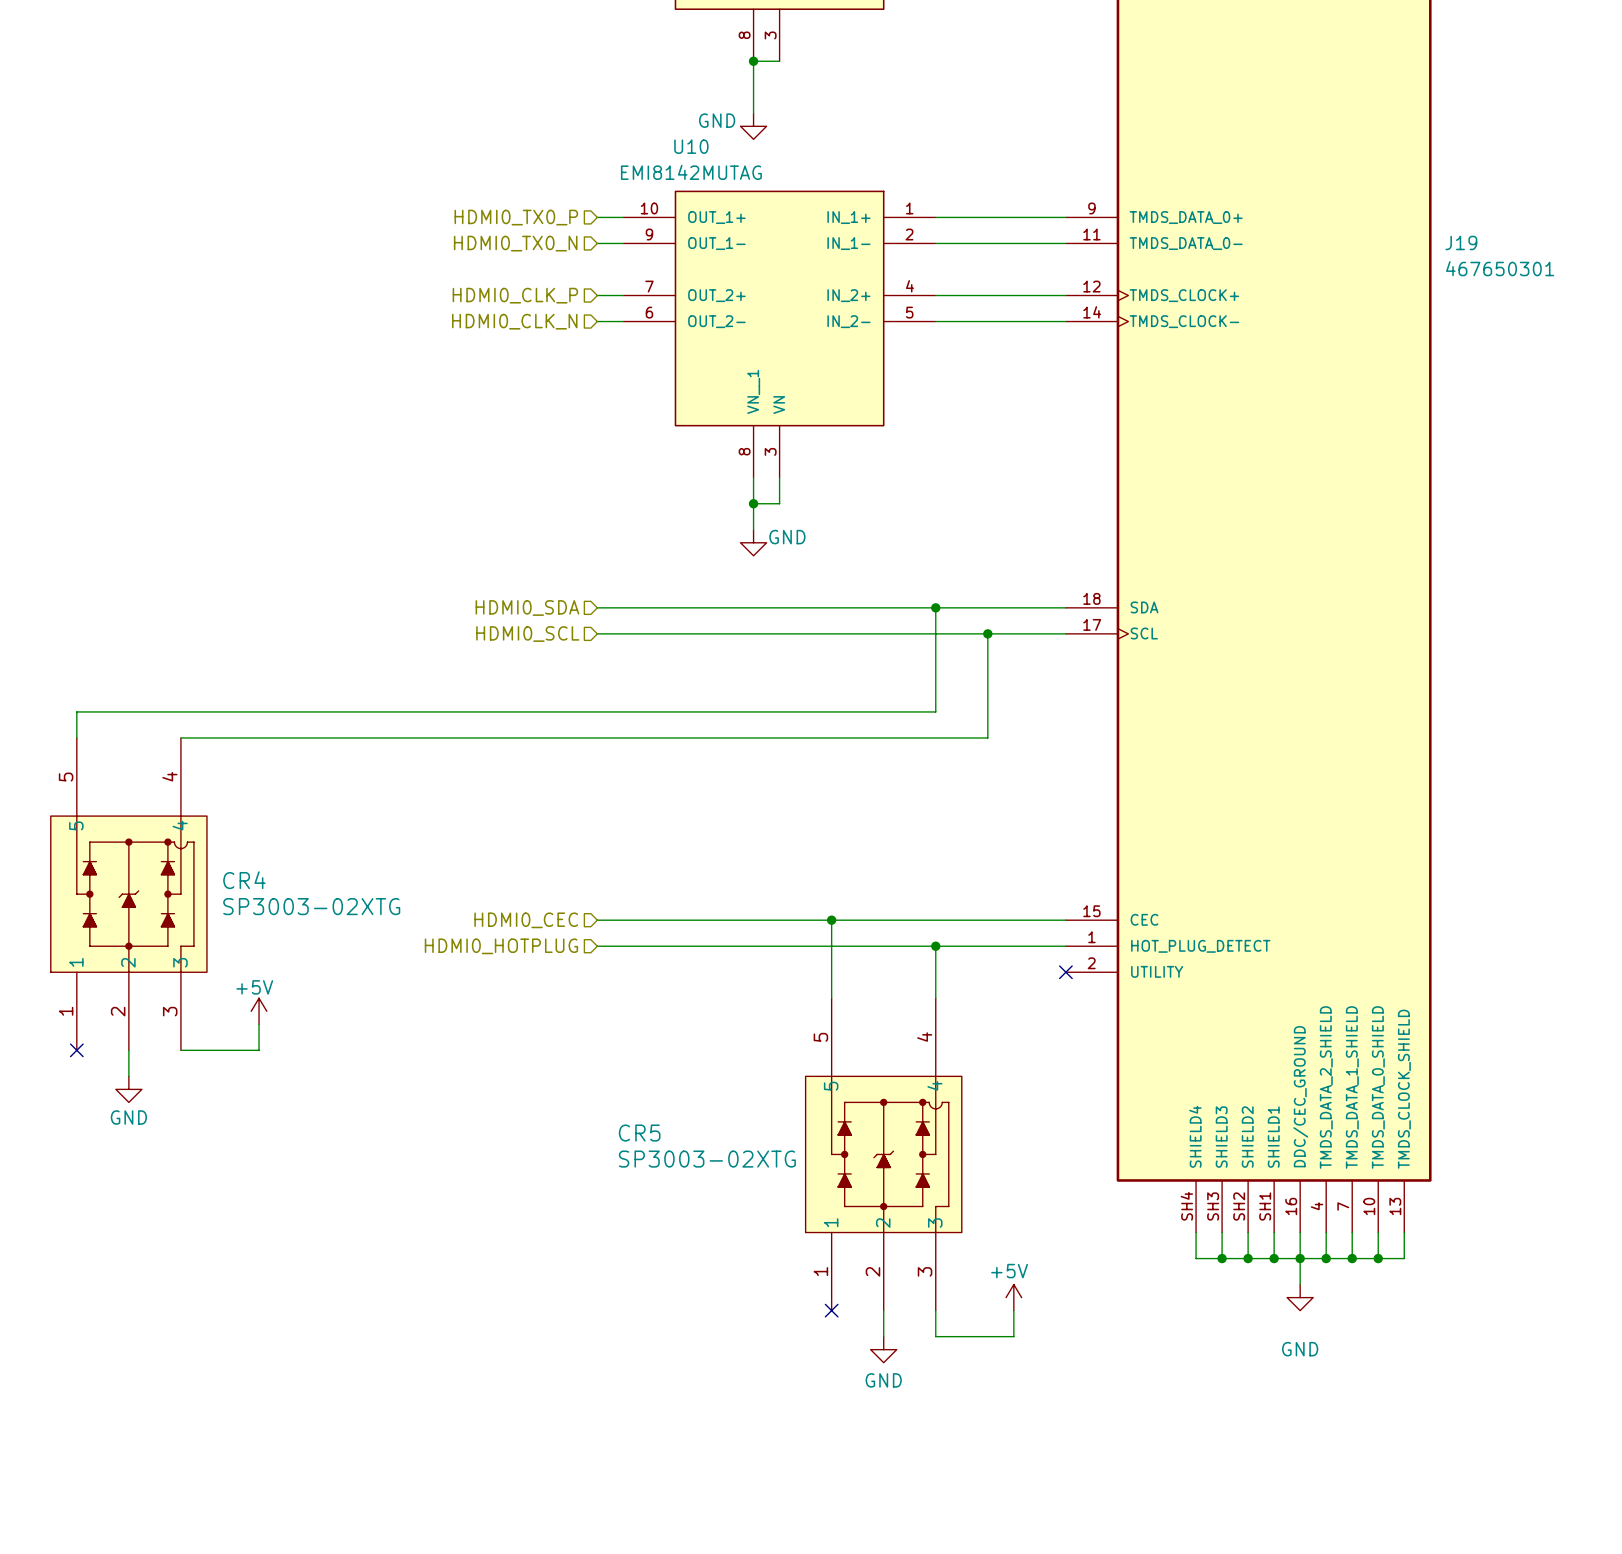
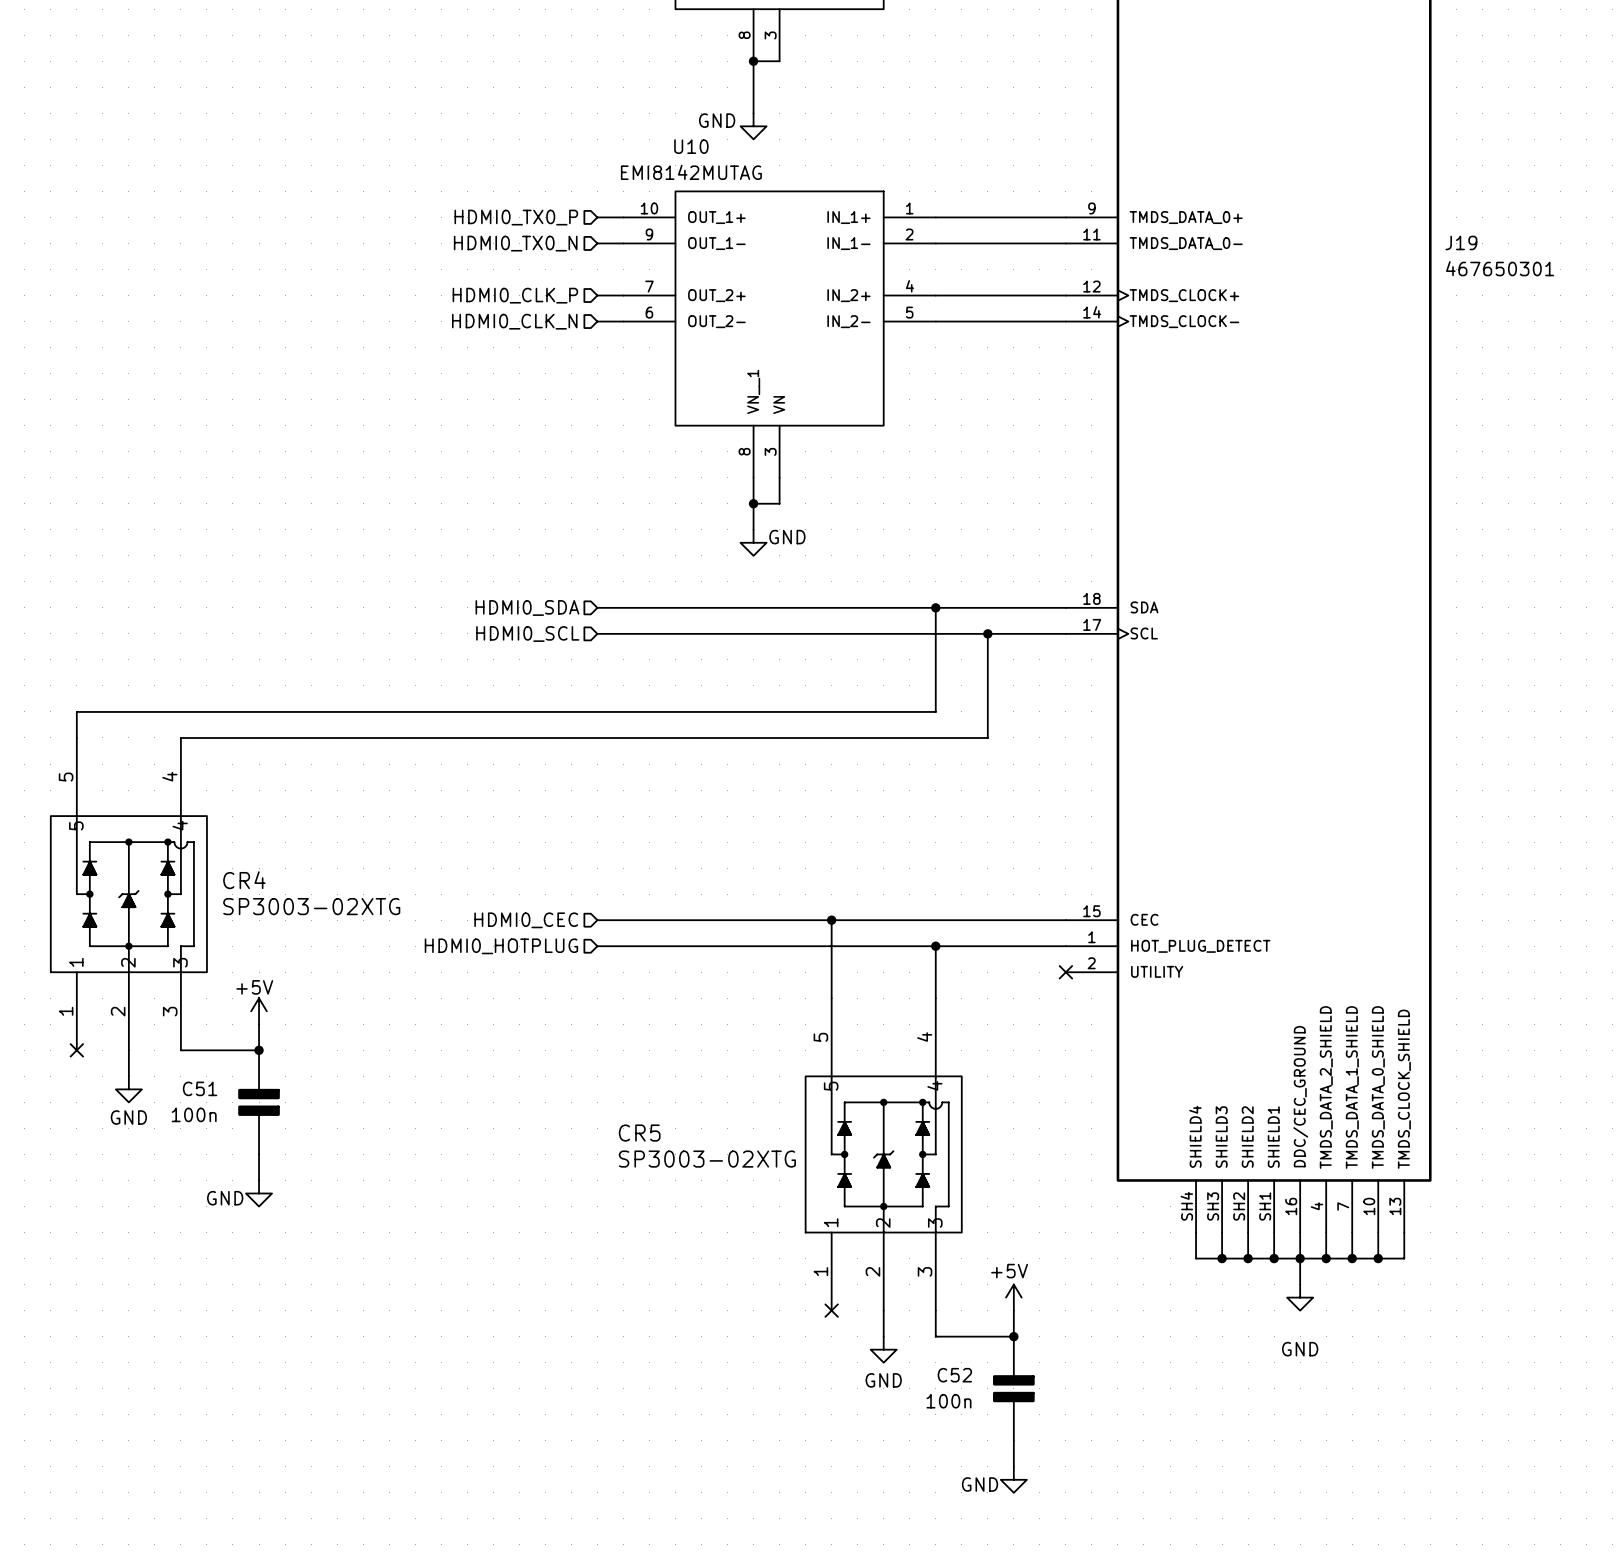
junction: none -> (259, 1050)
C51: none -> 100n (259, 1102)
wire: none -> (259, 1154) (259, 1180)
power symbol: none -> GND (259, 1193)
junction: none -> (1013, 1336)
C52: none -> 100n (1013, 1388)
wire: none -> (1013, 1440) (1013, 1466)
power symbol: none -> GND (1013, 1479)

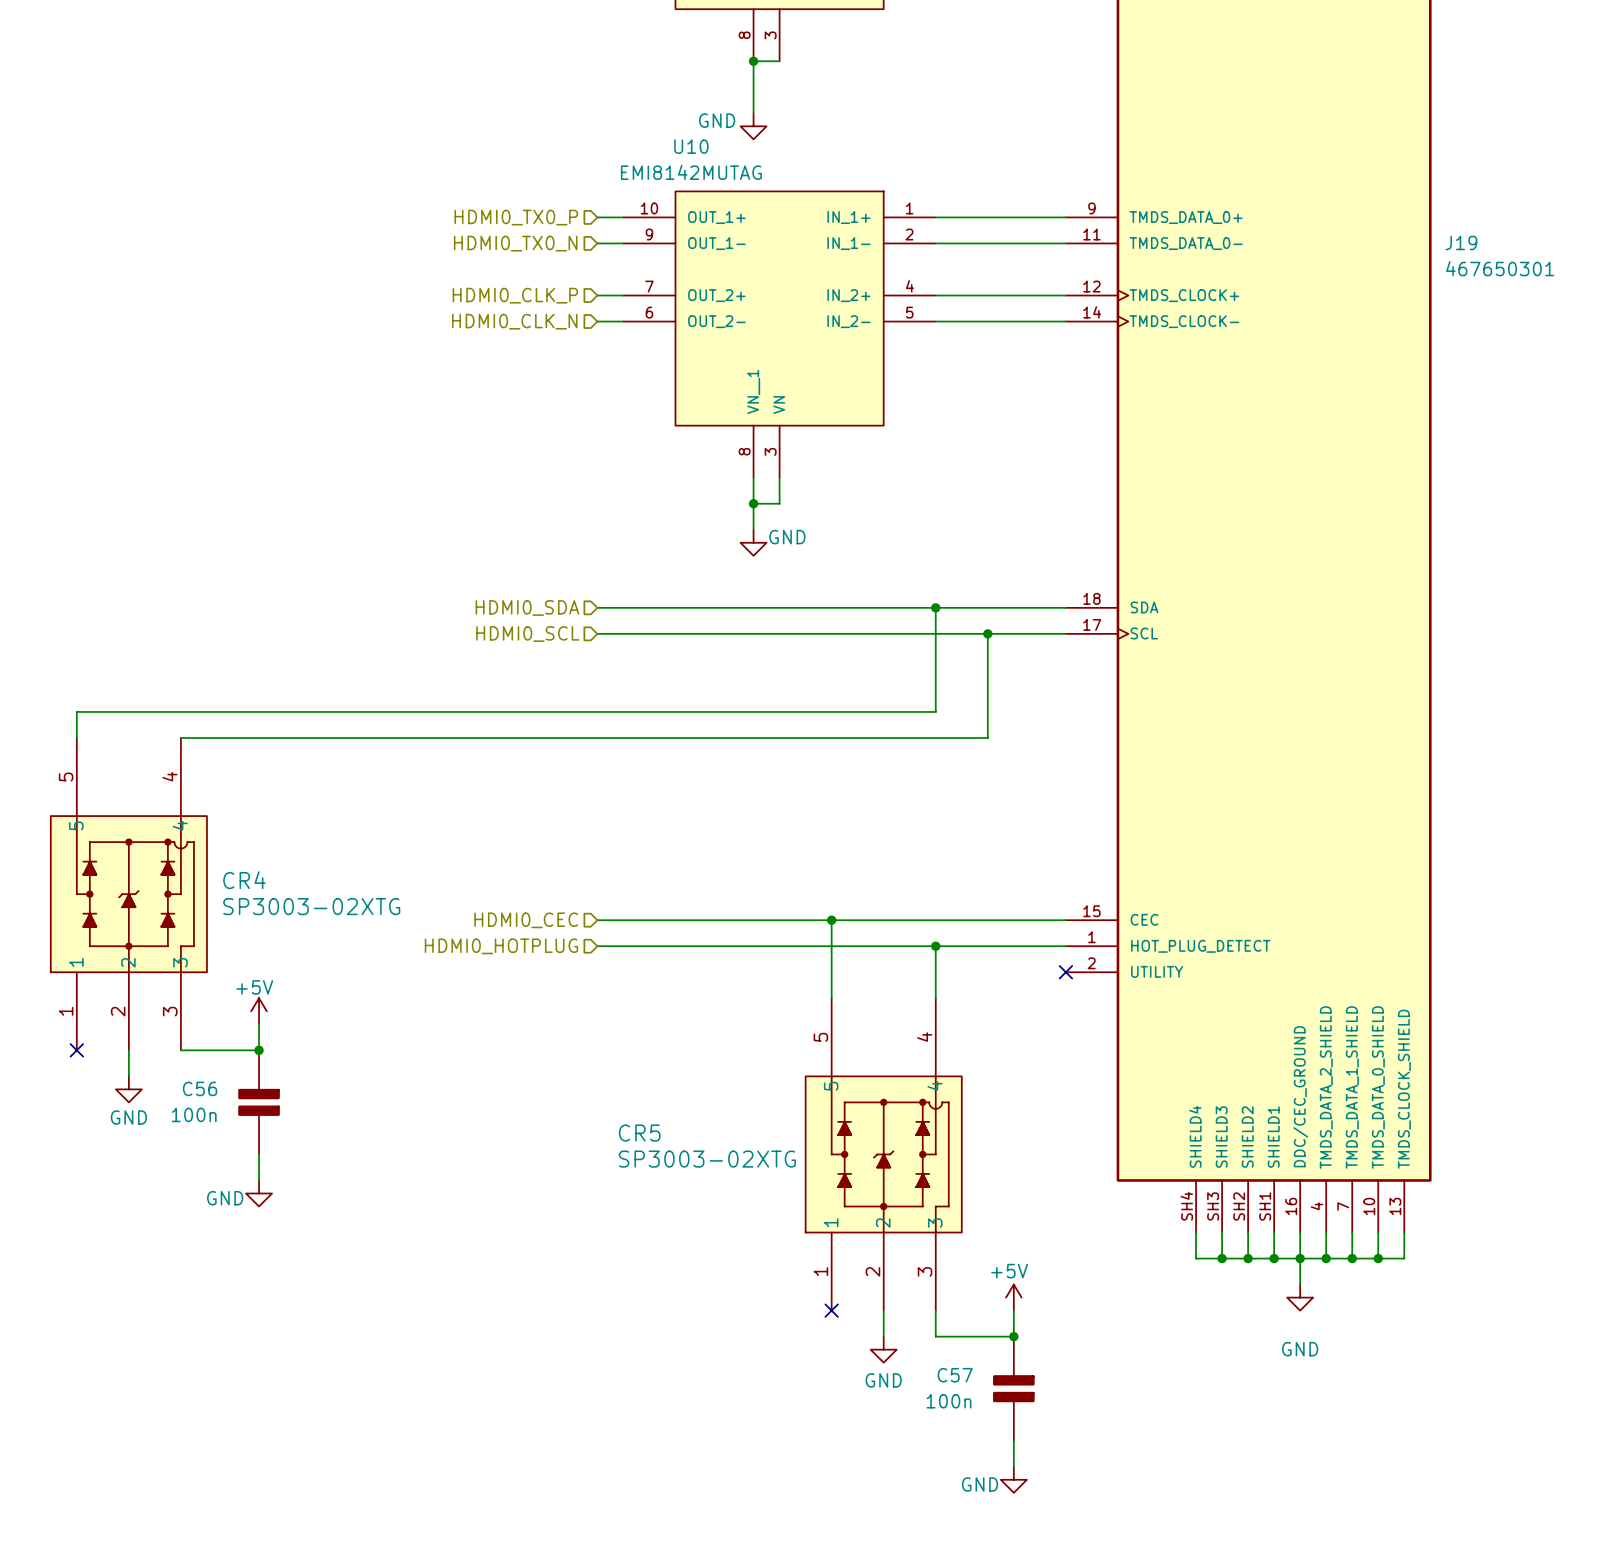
C51 name: C51 (200, 1088) -> C56 (200, 1088)
C52 name: C52 (954, 1375) -> C57 (955, 1375)

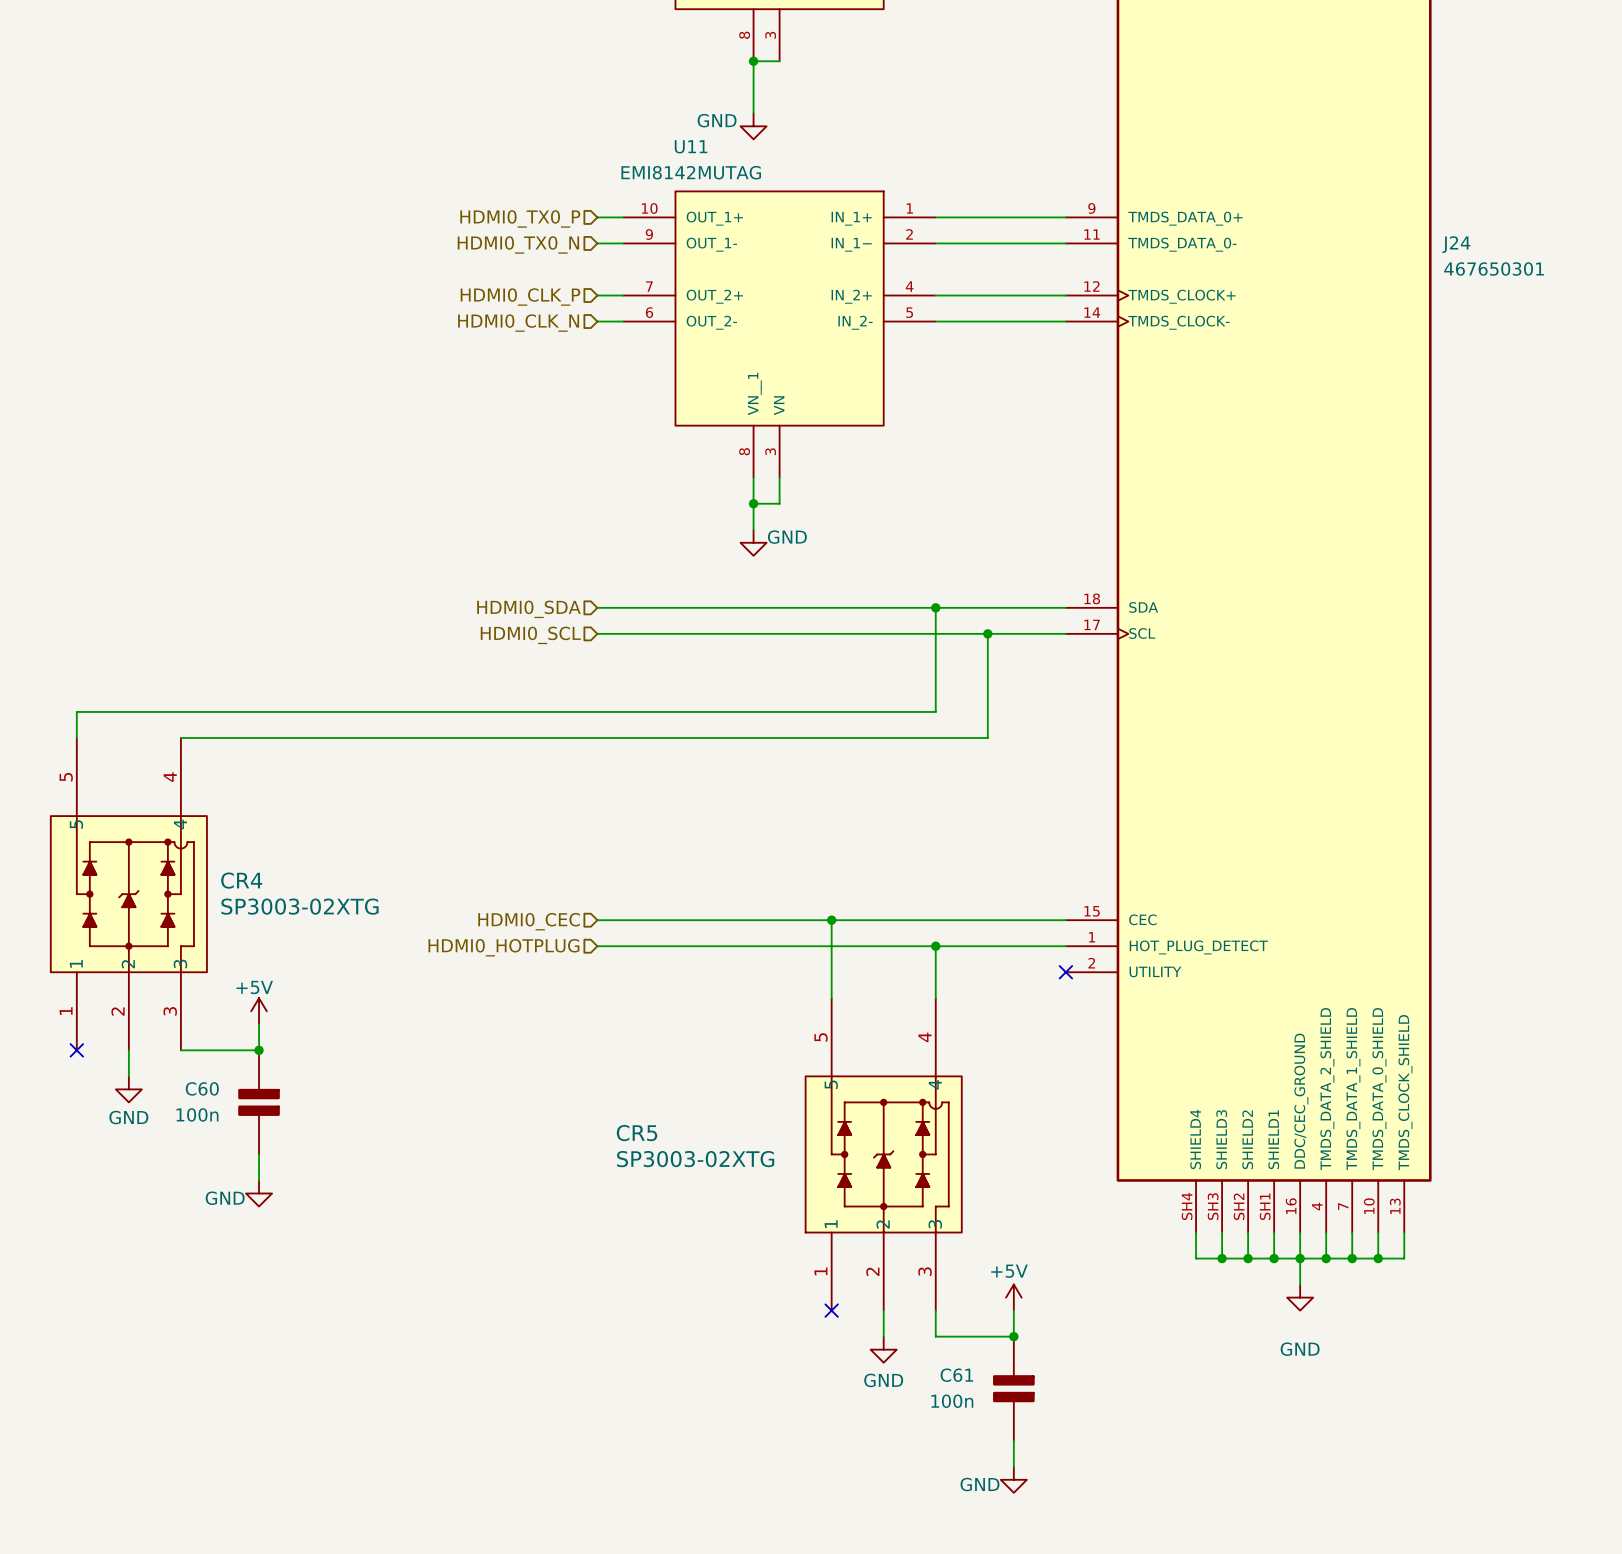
U10 name: U10 (691, 146) -> U11 (691, 146)
J19 name: J19 (1461, 242) -> J24 (1456, 244)
C56 name: C56 (200, 1088) -> C60 (202, 1088)
C57 name: C57 (955, 1375) -> C61 (956, 1375)

